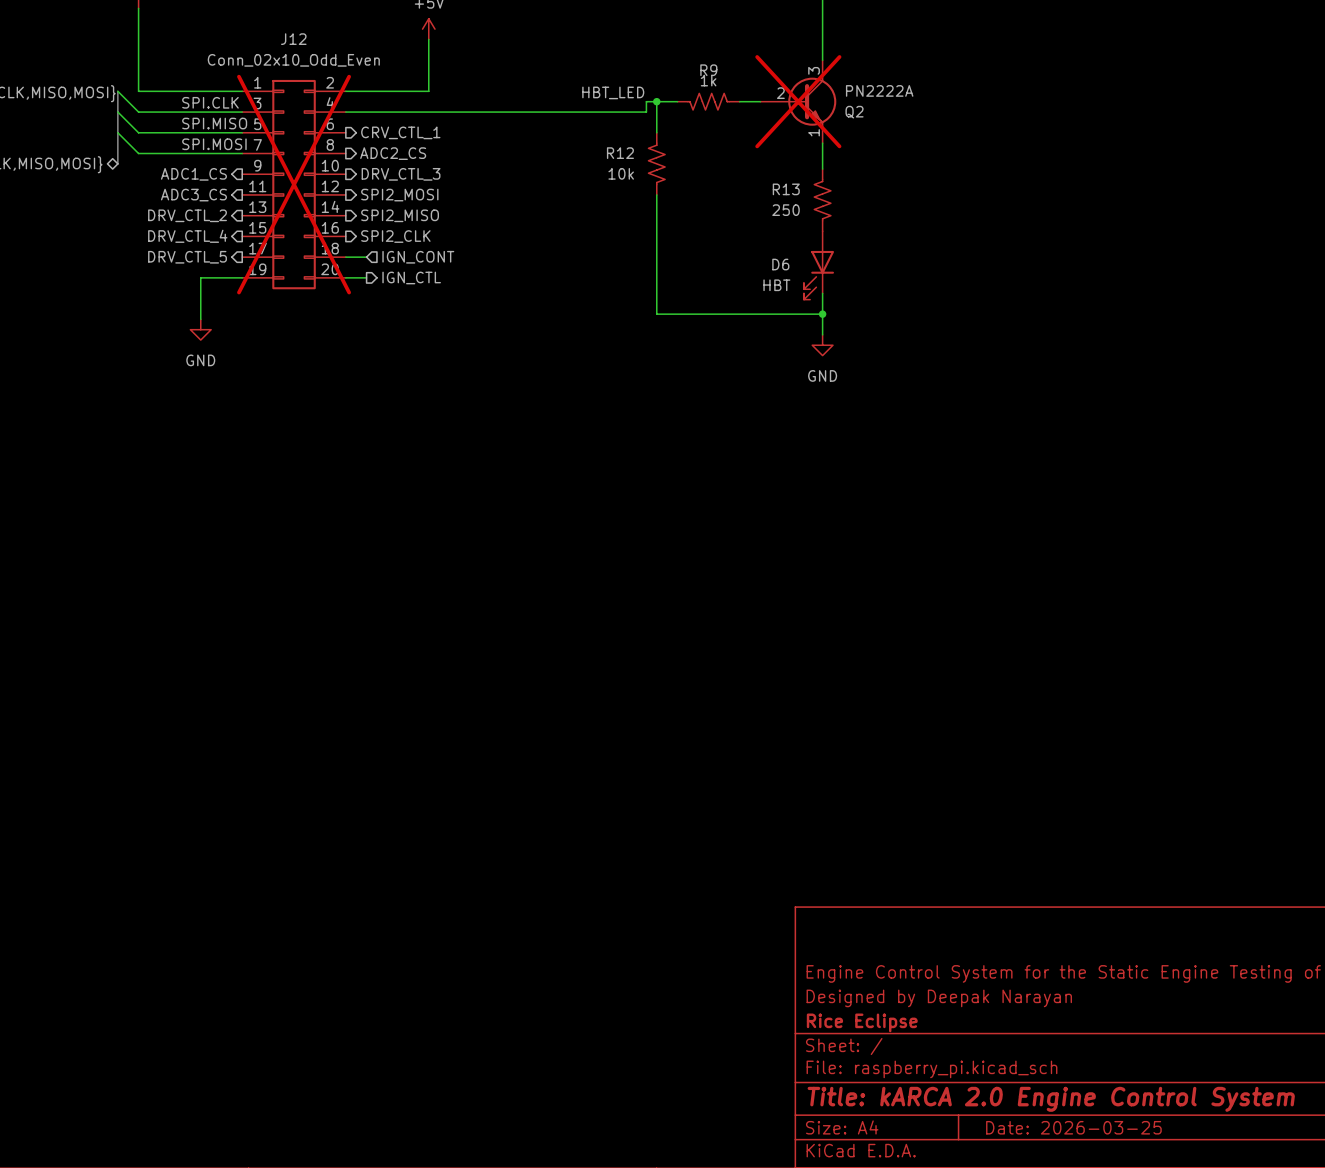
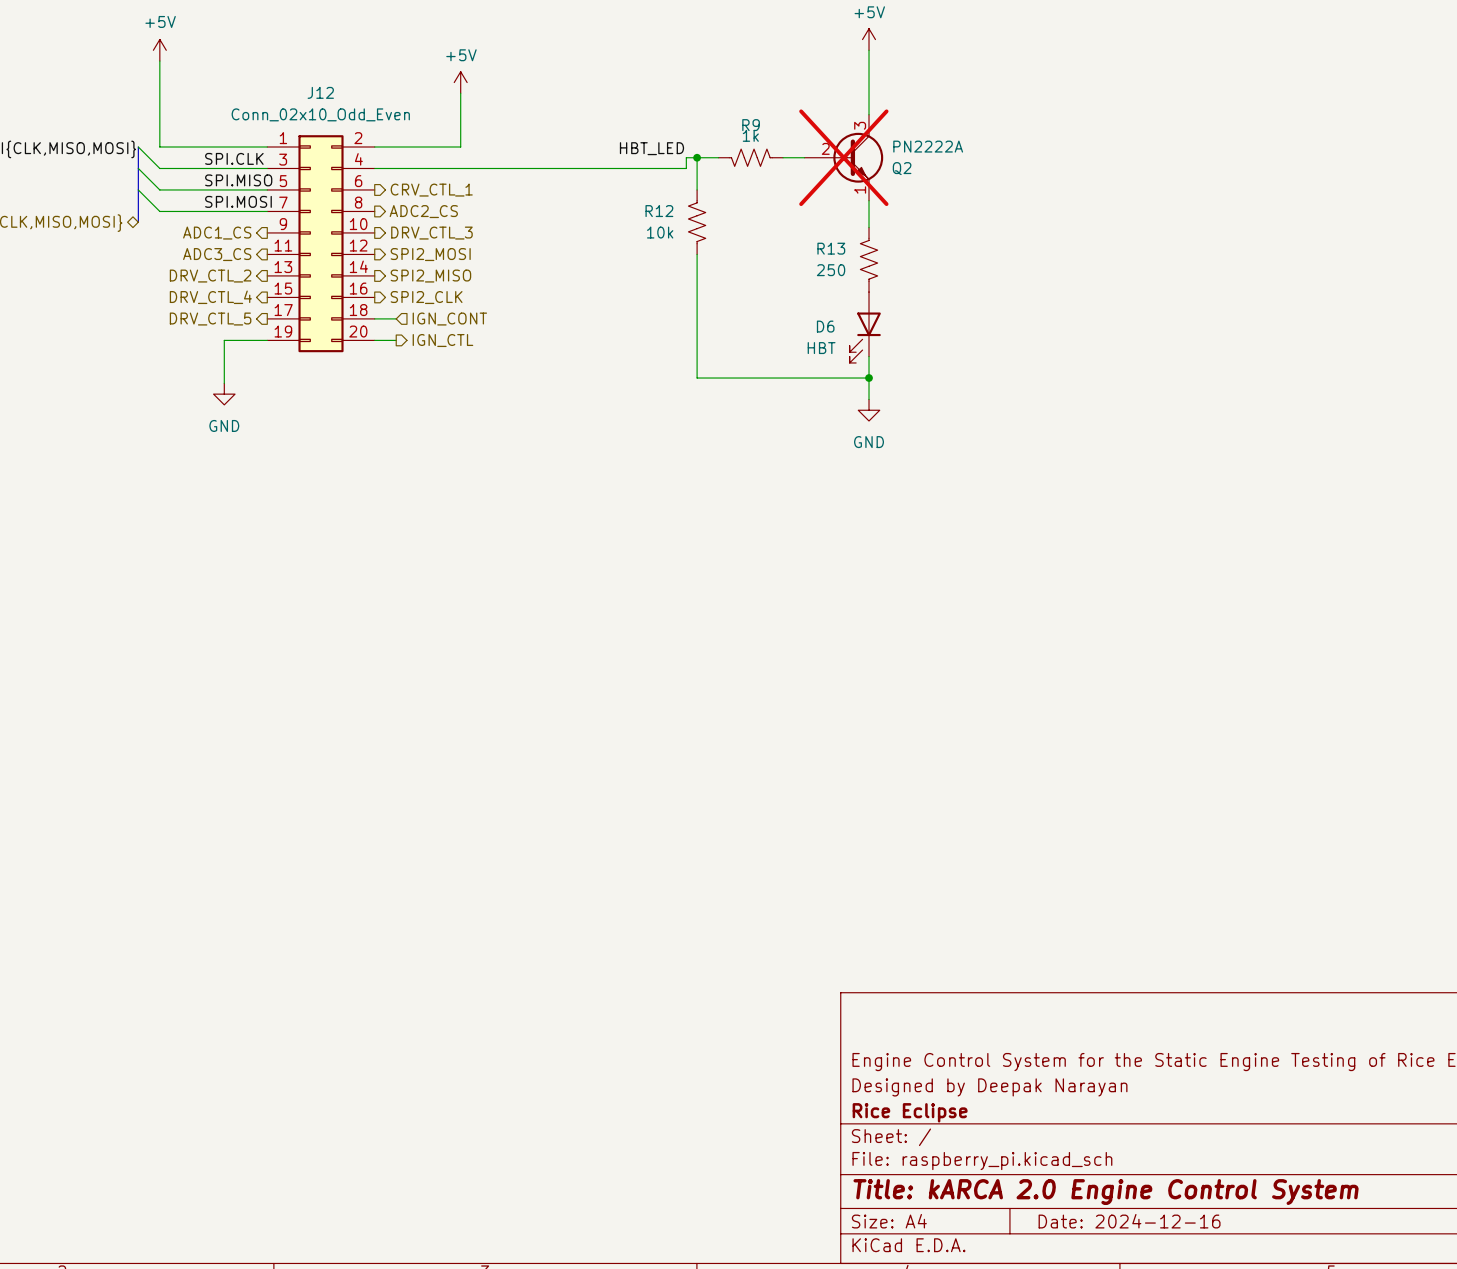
J12 do-not-place cross: (294, 184) -> none
title block: Date: 2026-03-25 (1073, 1127) -> Date: 2024-12-16 (1129, 1221)

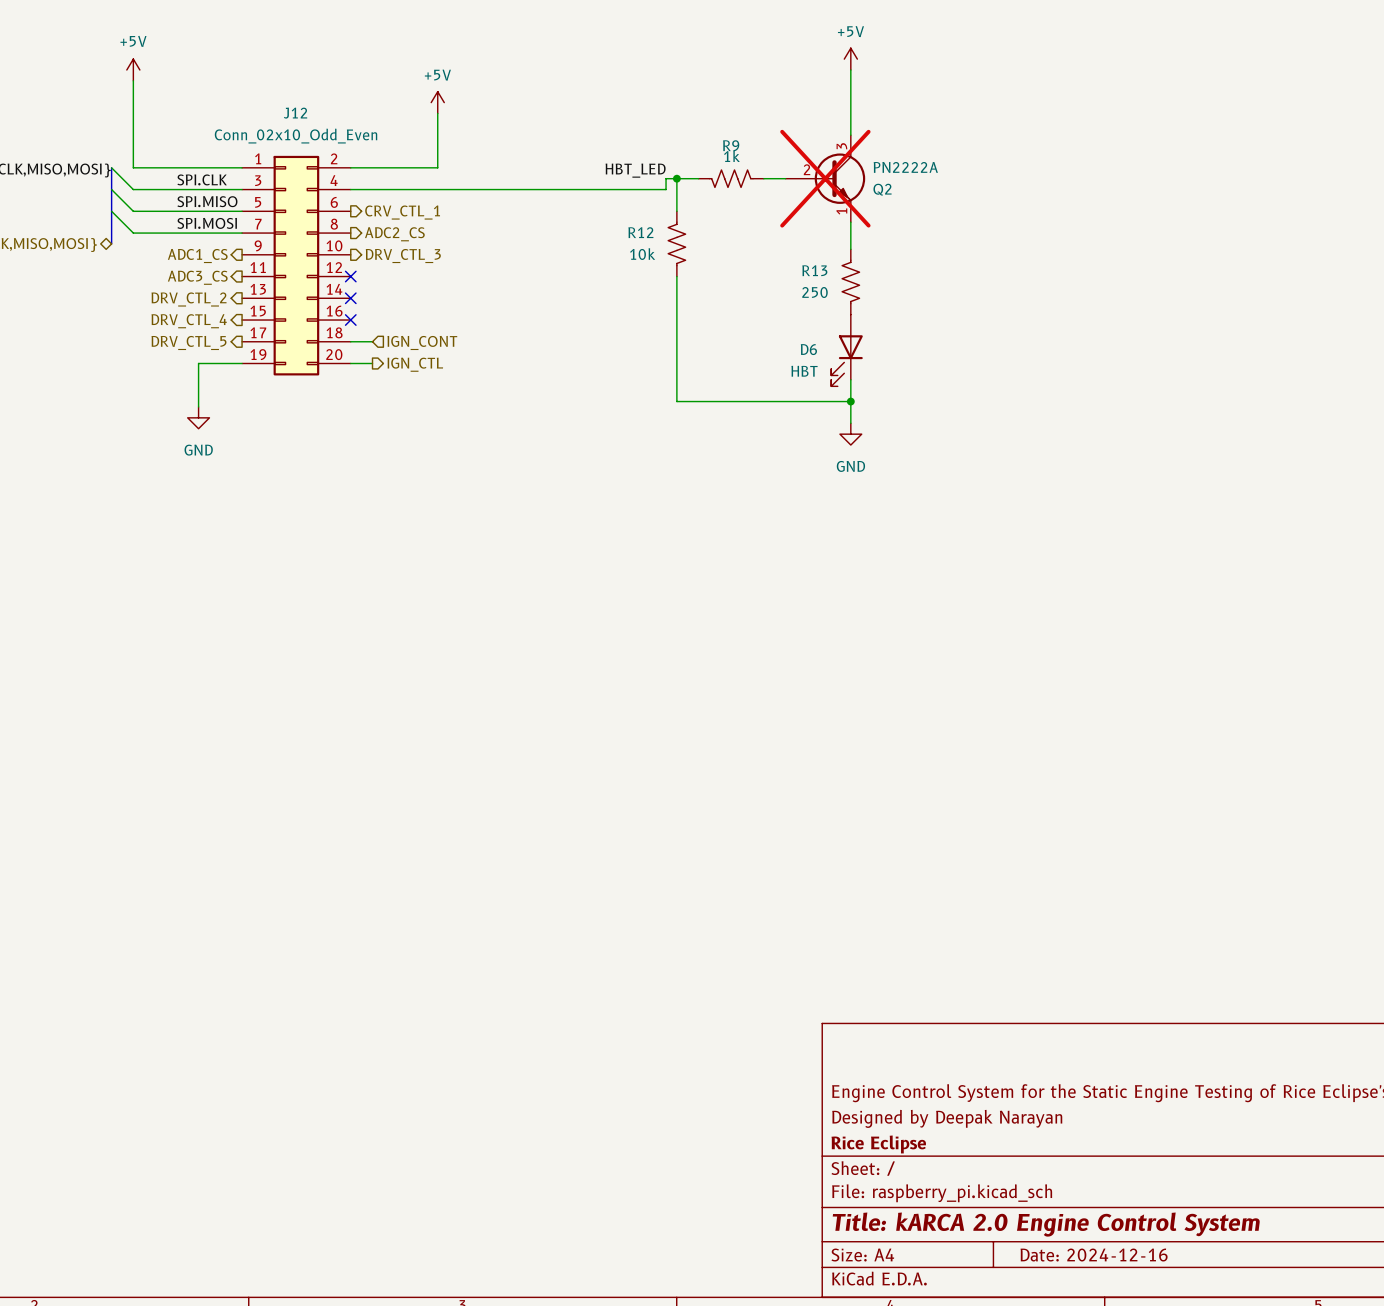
no-connect mark: none -> (350, 276)
hierarchical label: SPI2_MOSI (430, 254) -> none
no-connect mark: none -> (350, 298)
hierarchical label: SPI2_MISO (430, 276) -> none
no-connect mark: none -> (350, 320)
hierarchical label: SPI2_CLK (426, 297) -> none

